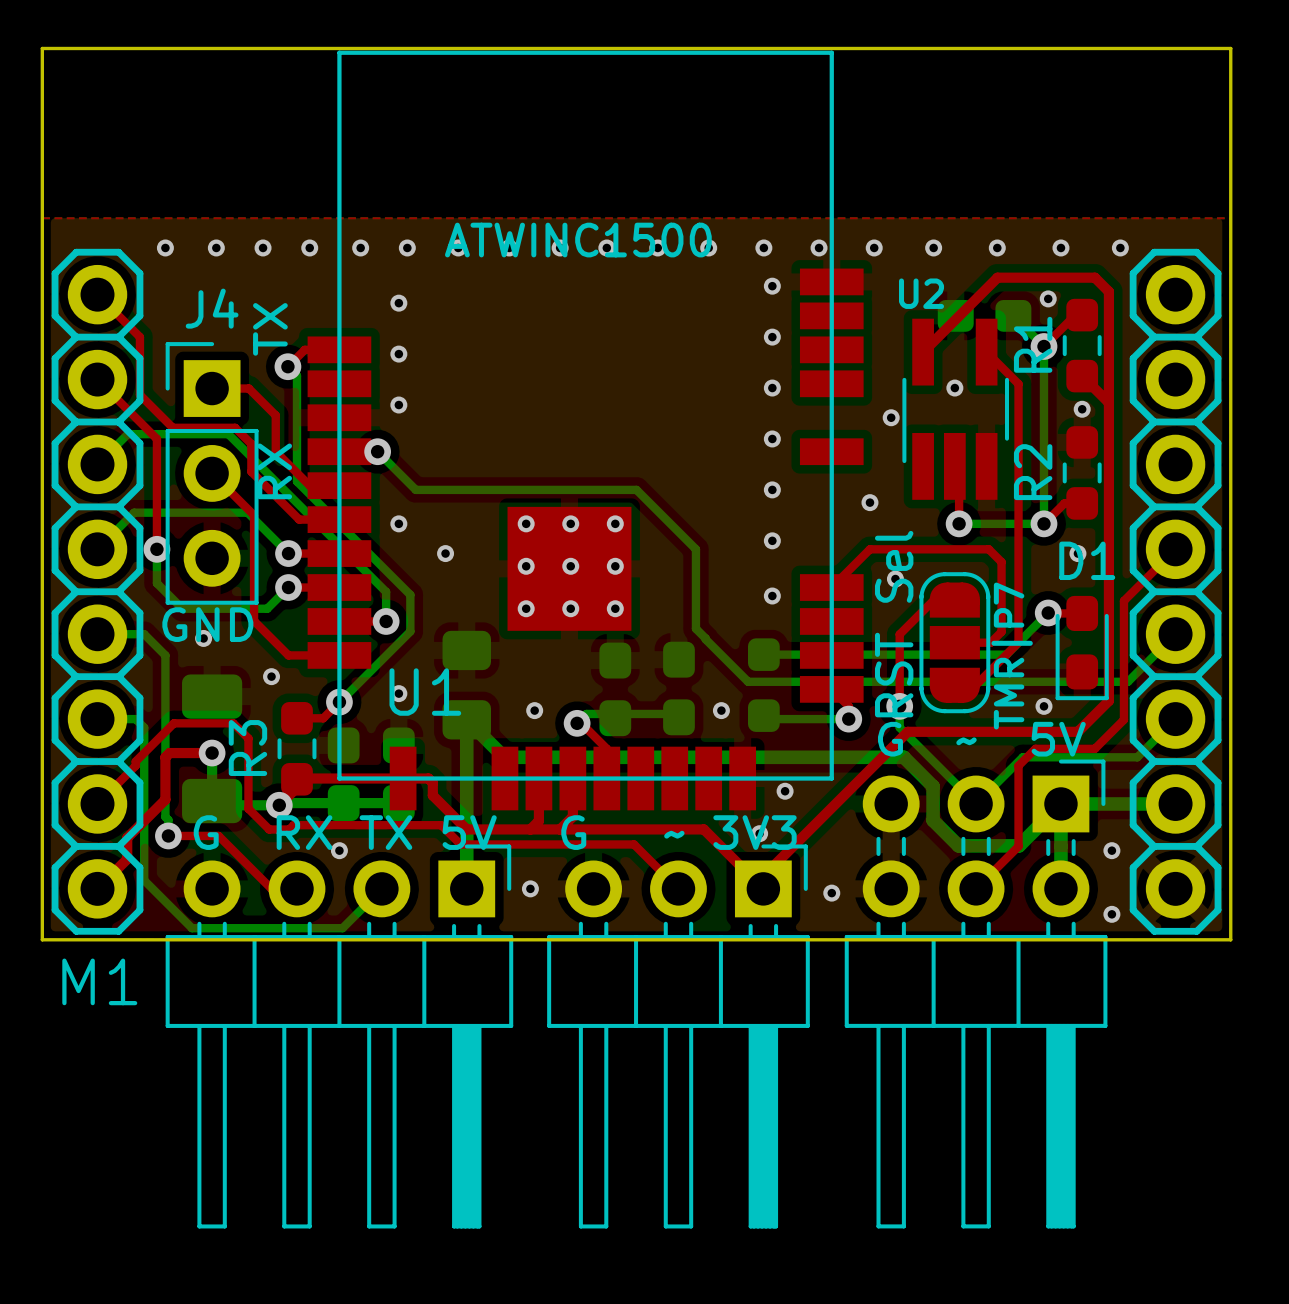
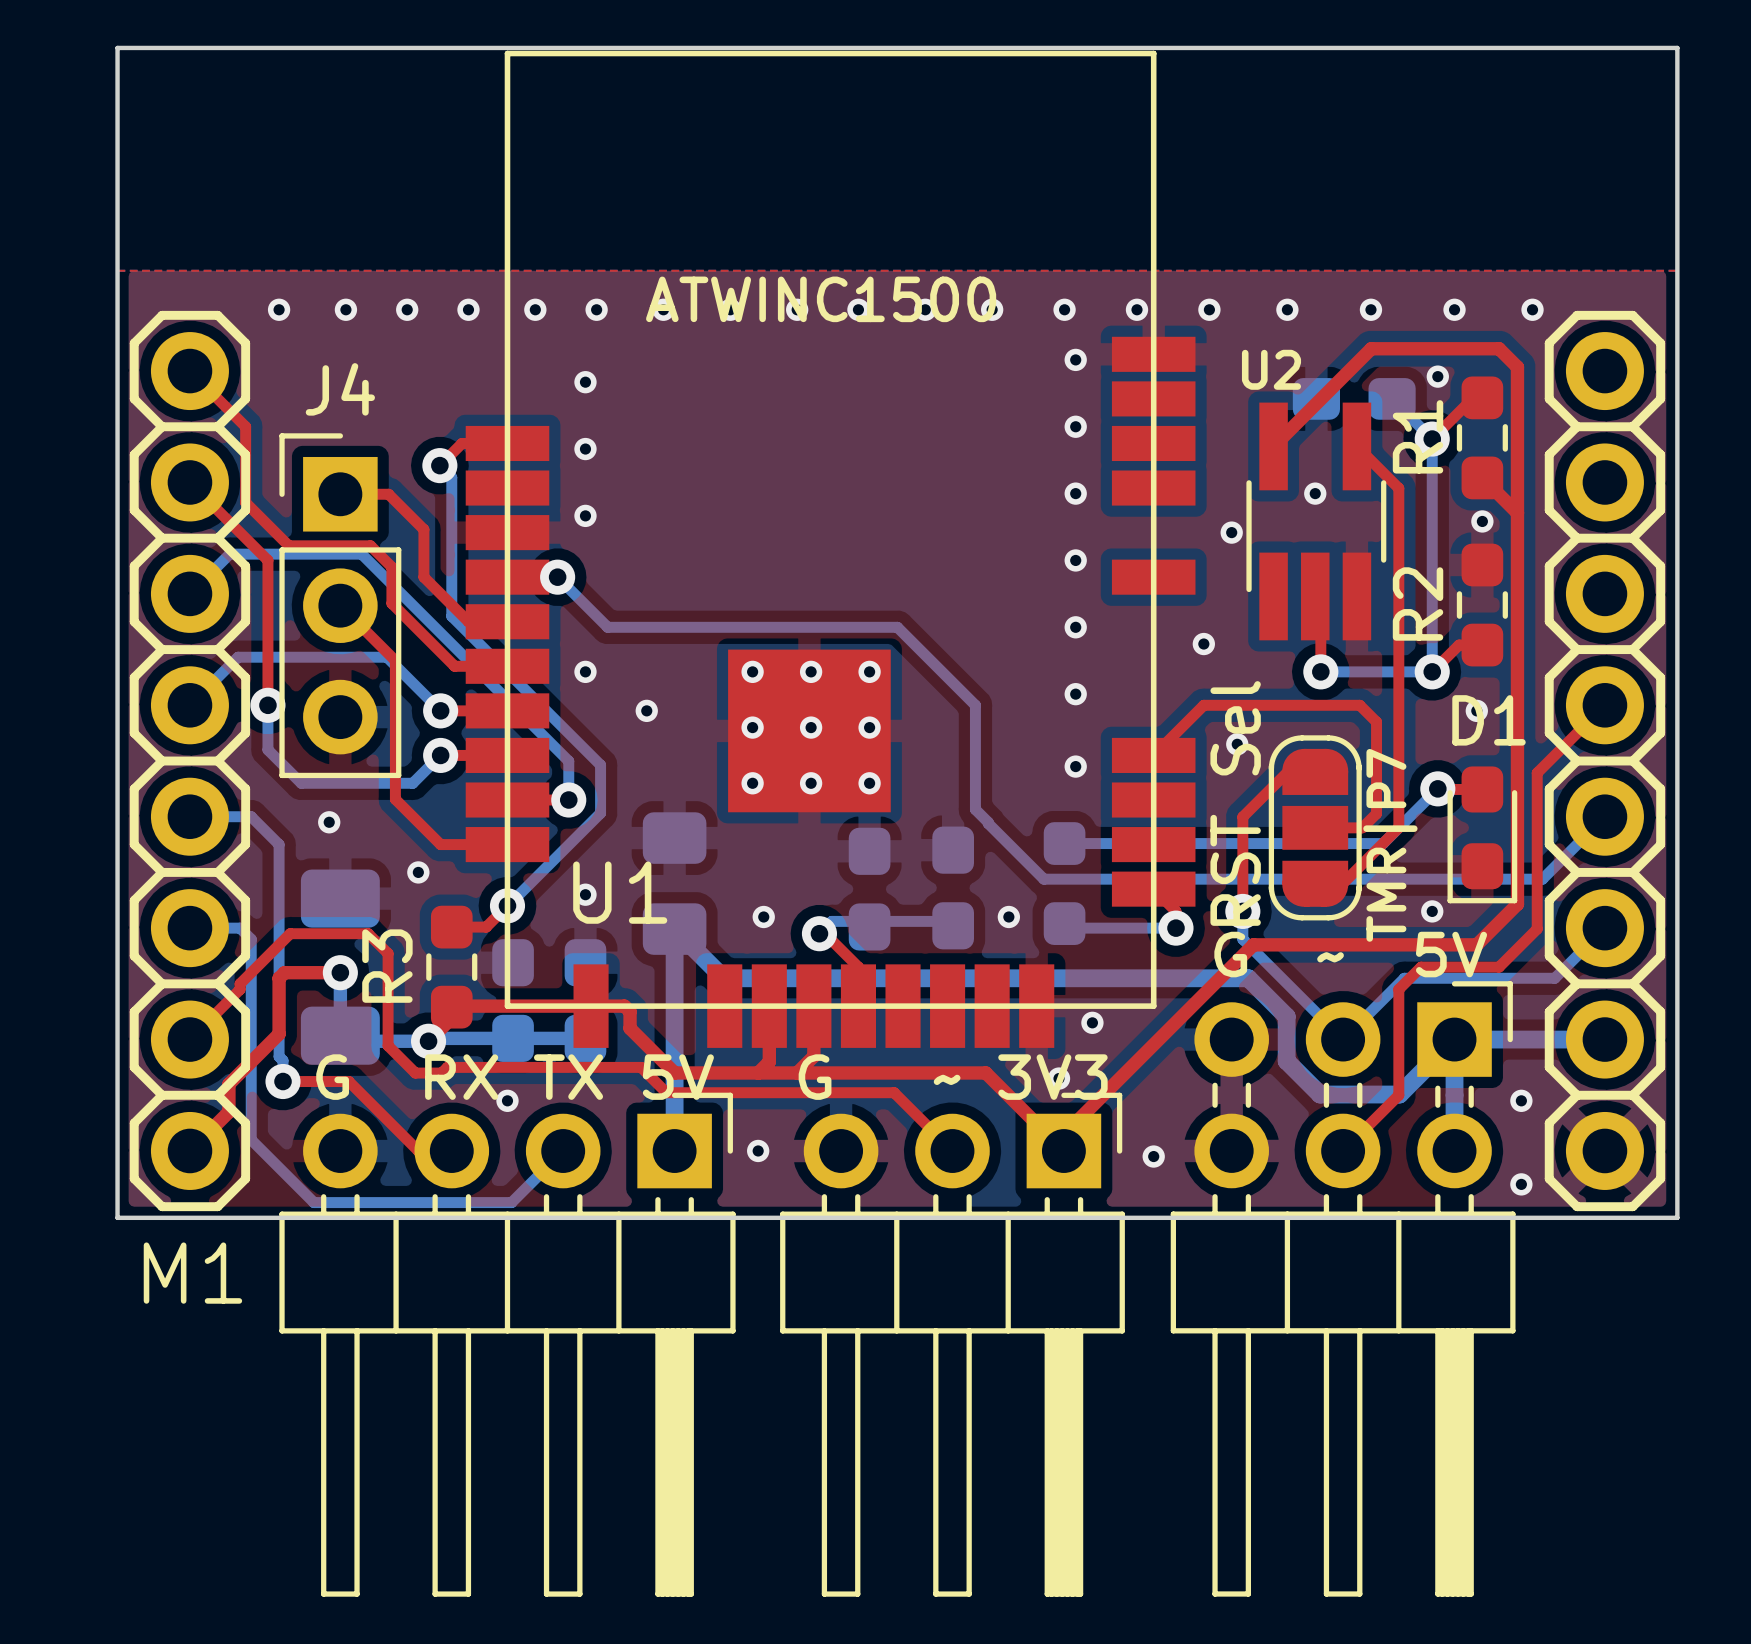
text: TX (270, 329) -> none
text: RX (274, 471) -> none
text: GND (207, 624) -> none

